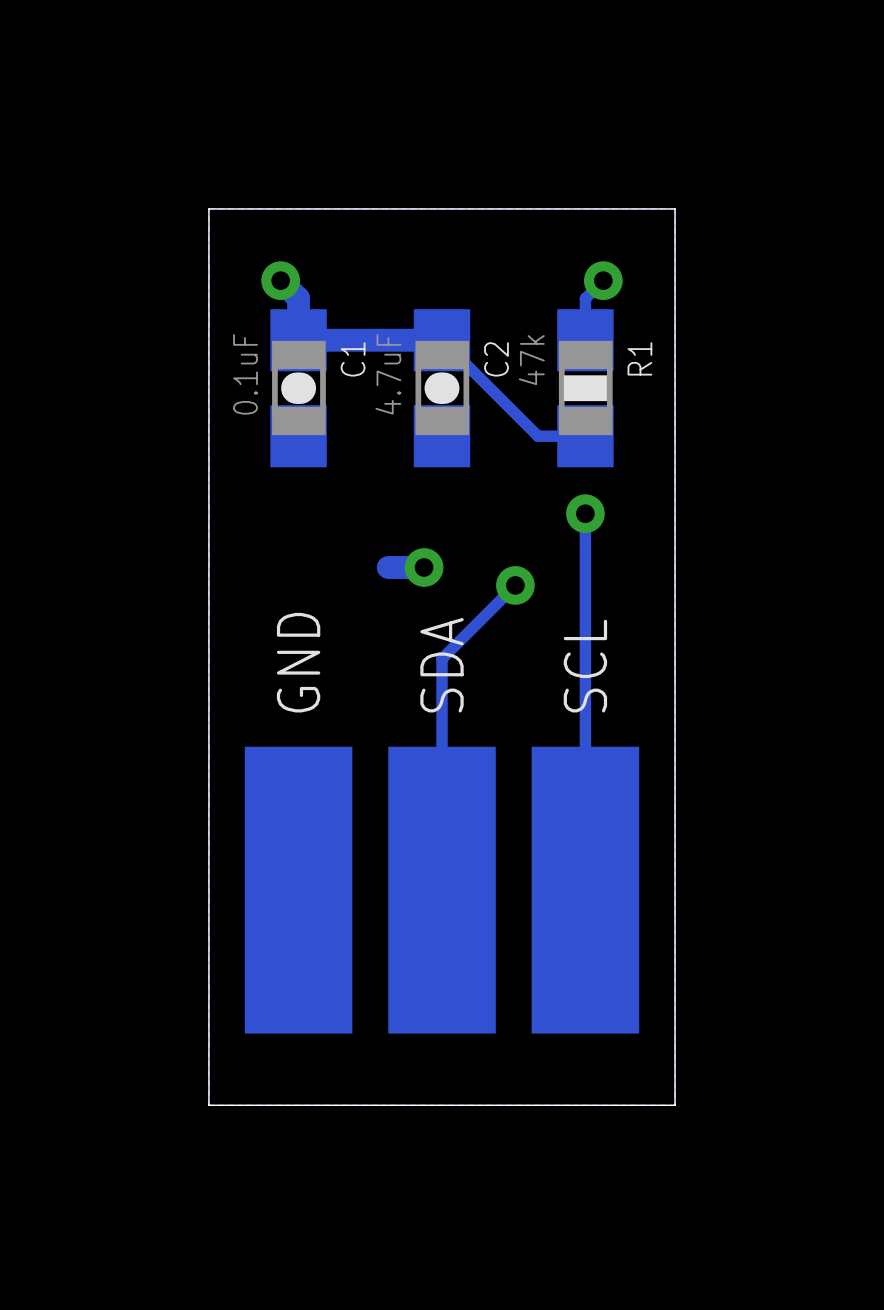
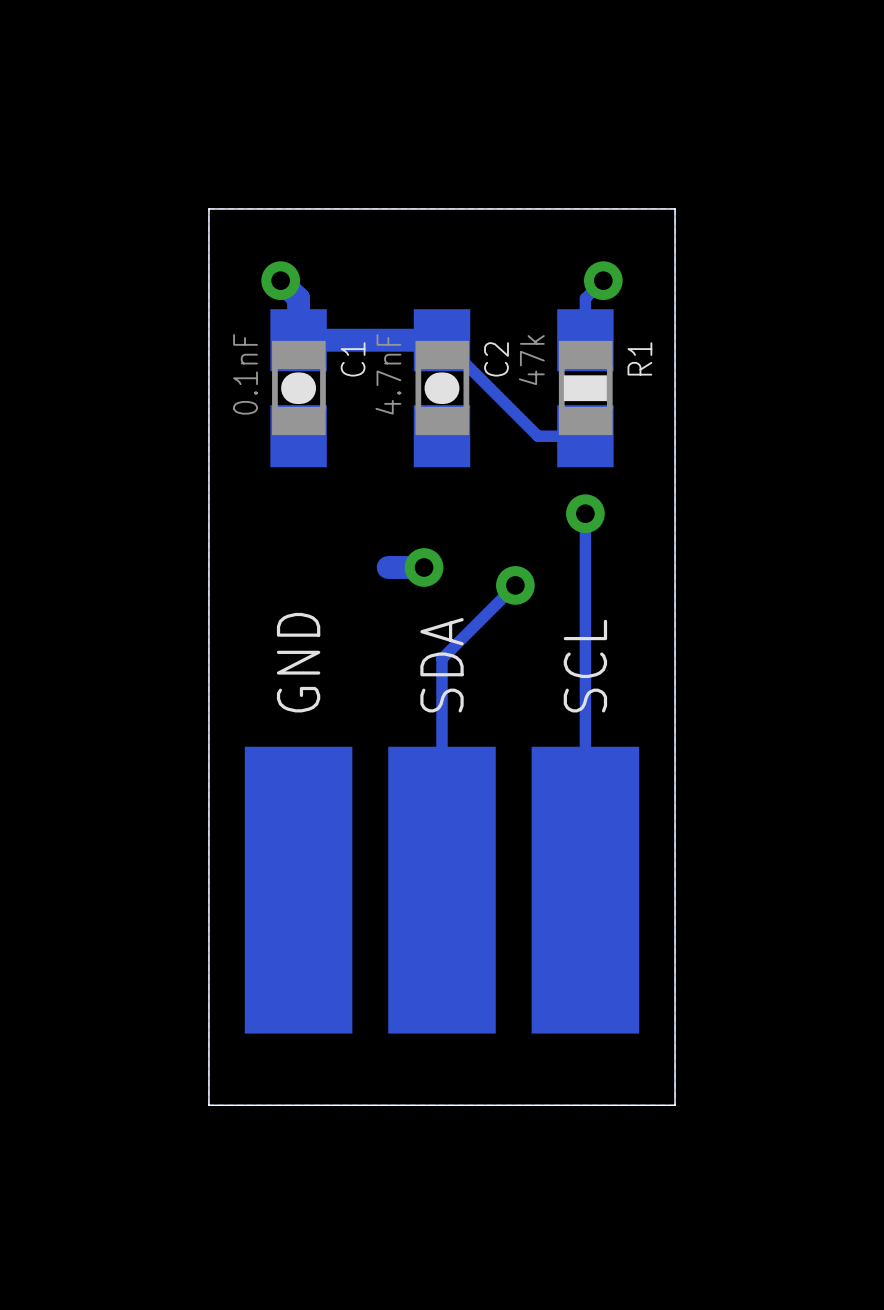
C1 value: 0.1uF (245, 374) -> 0.1nF (245, 374)
C2 value: 4.7uF (388, 374) -> 4.7nF (388, 374)

